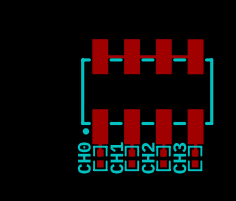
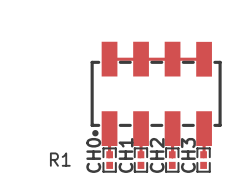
R1 name: none -> R1 (60, 159)

